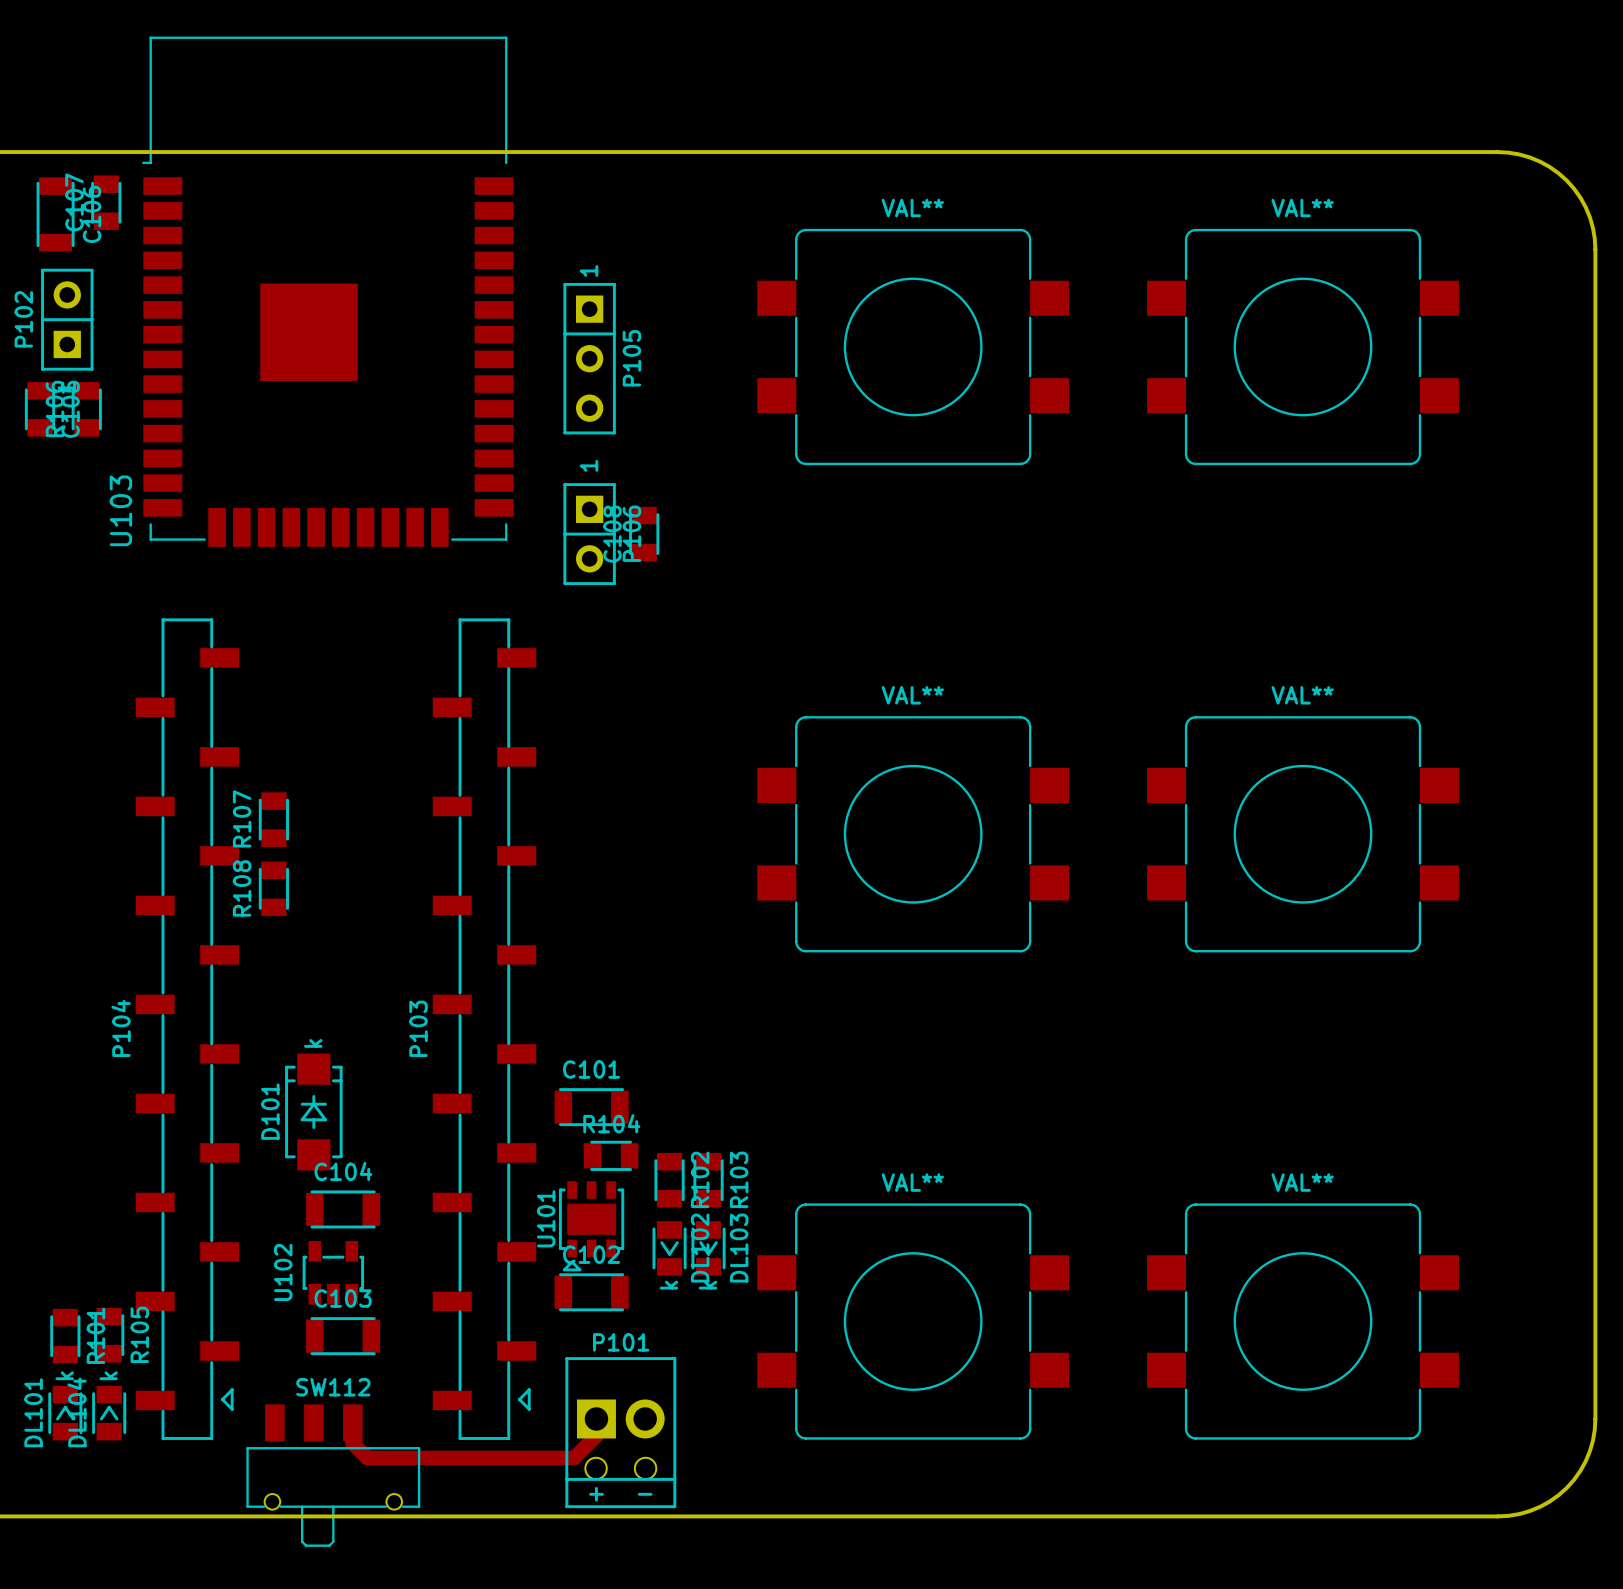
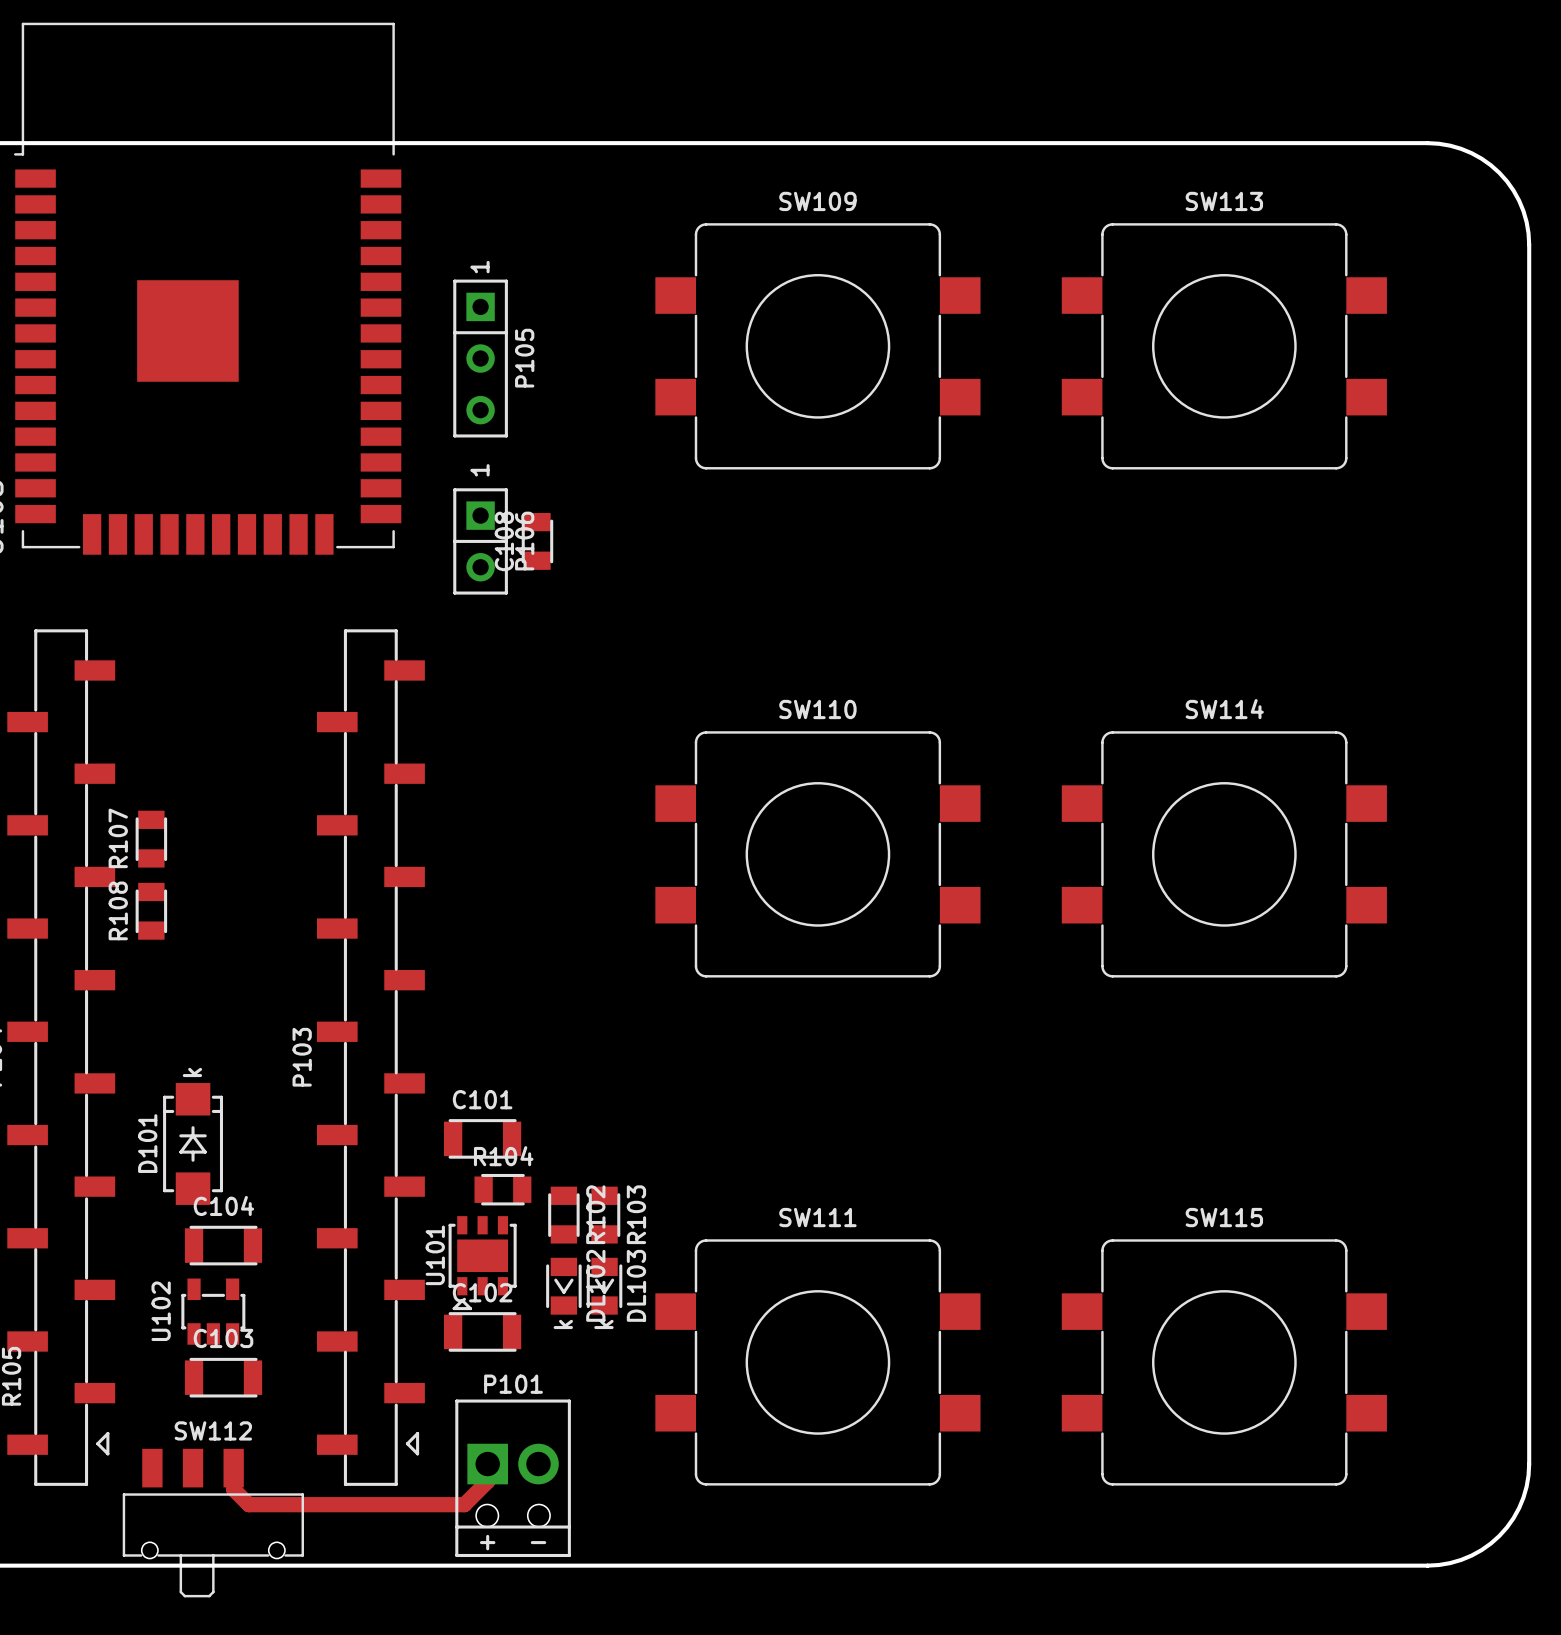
VAL** name: VAL** (912, 208) -> SW109 (817, 201)
VAL** name: VAL** (1302, 208) -> SW113 (1224, 201)
VAL** name: VAL** (912, 695) -> SW110 (817, 709)
VAL** name: VAL** (1302, 695) -> SW114 (1224, 709)
VAL** name: VAL** (912, 1182) -> SW111 (817, 1217)
VAL** name: VAL** (1302, 1182) -> SW115 (1224, 1217)

